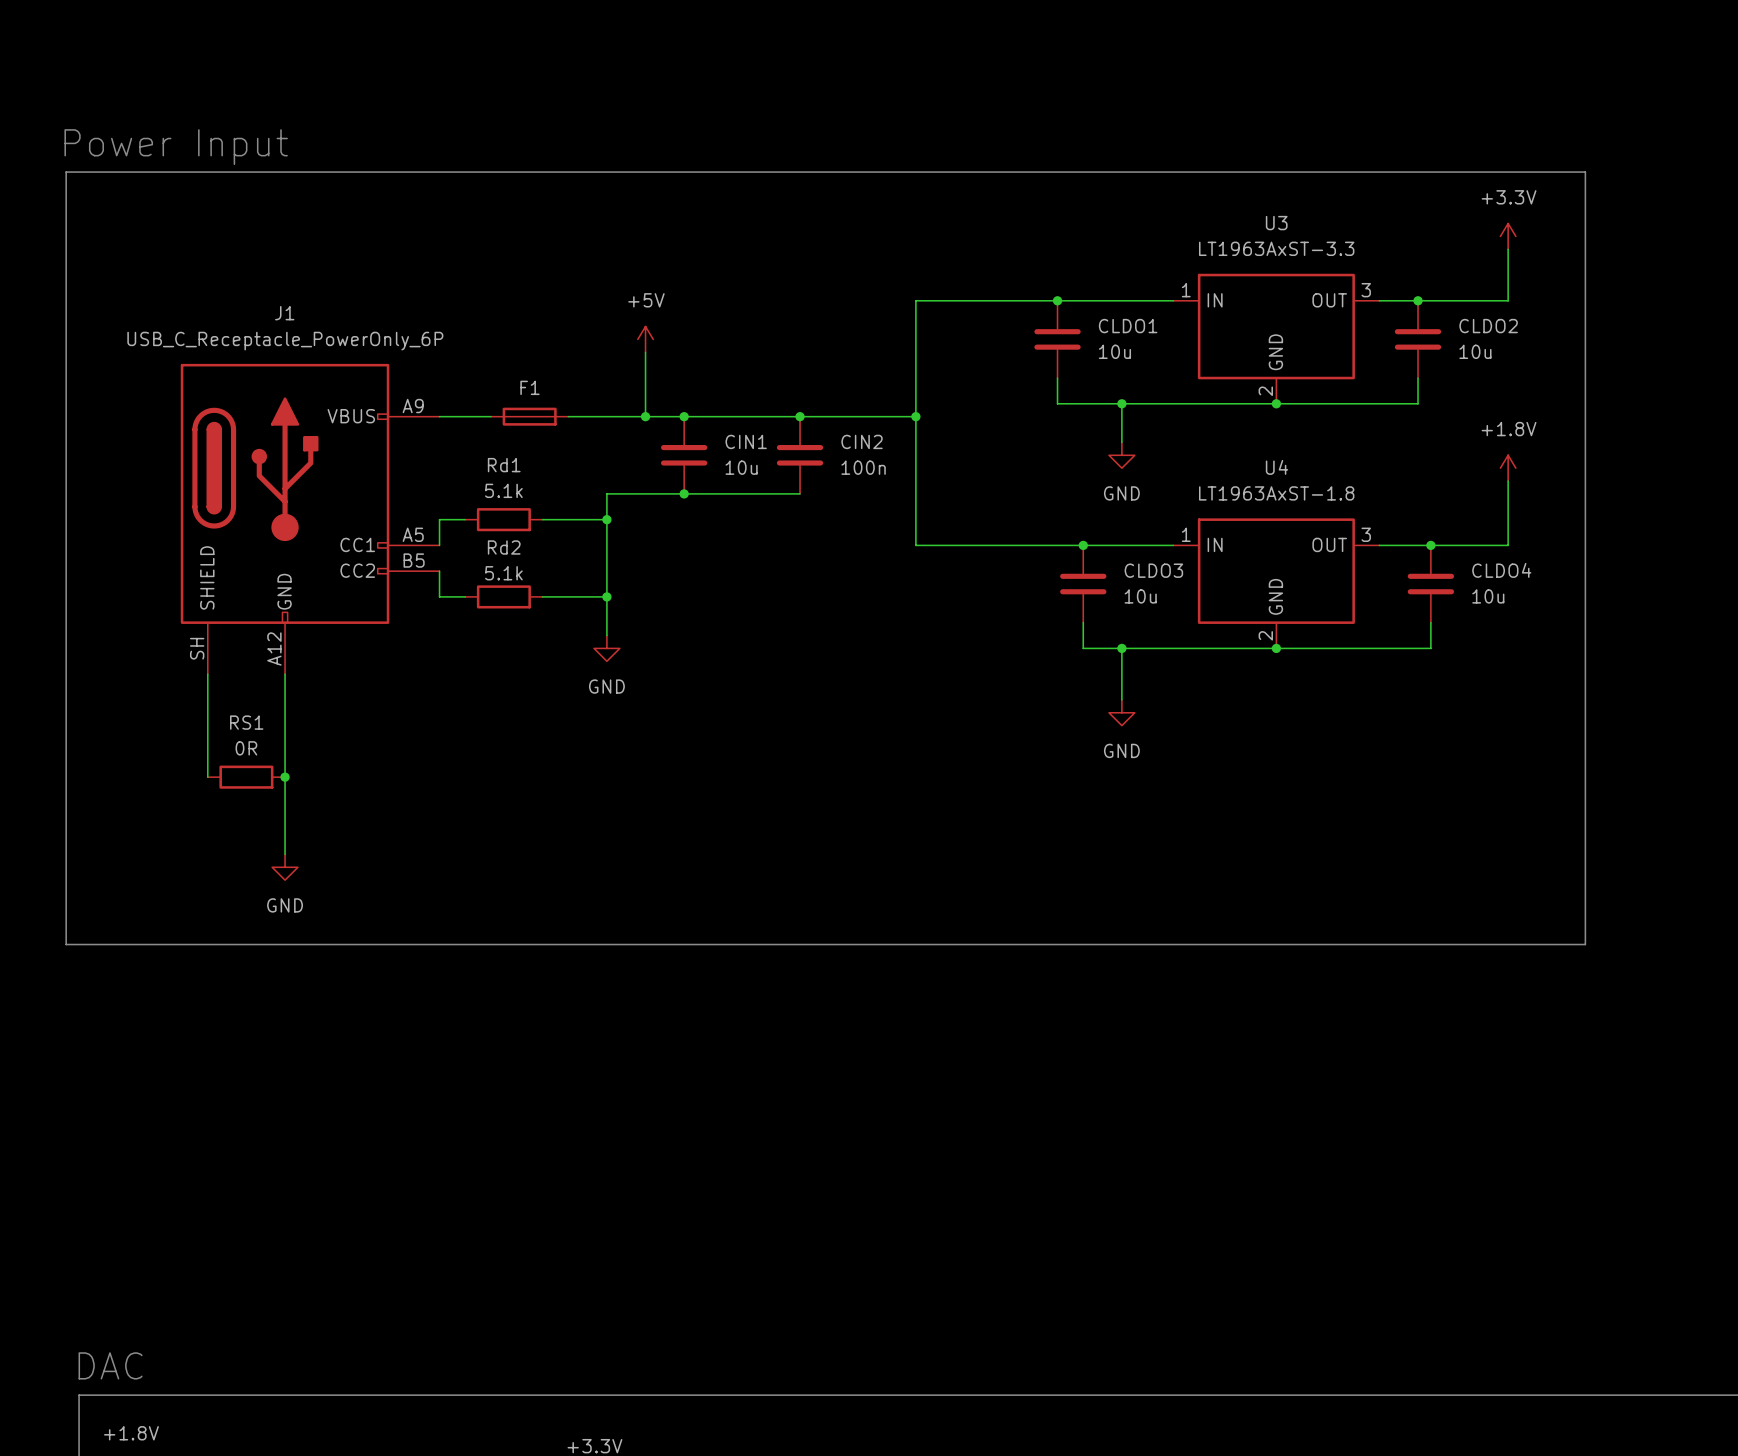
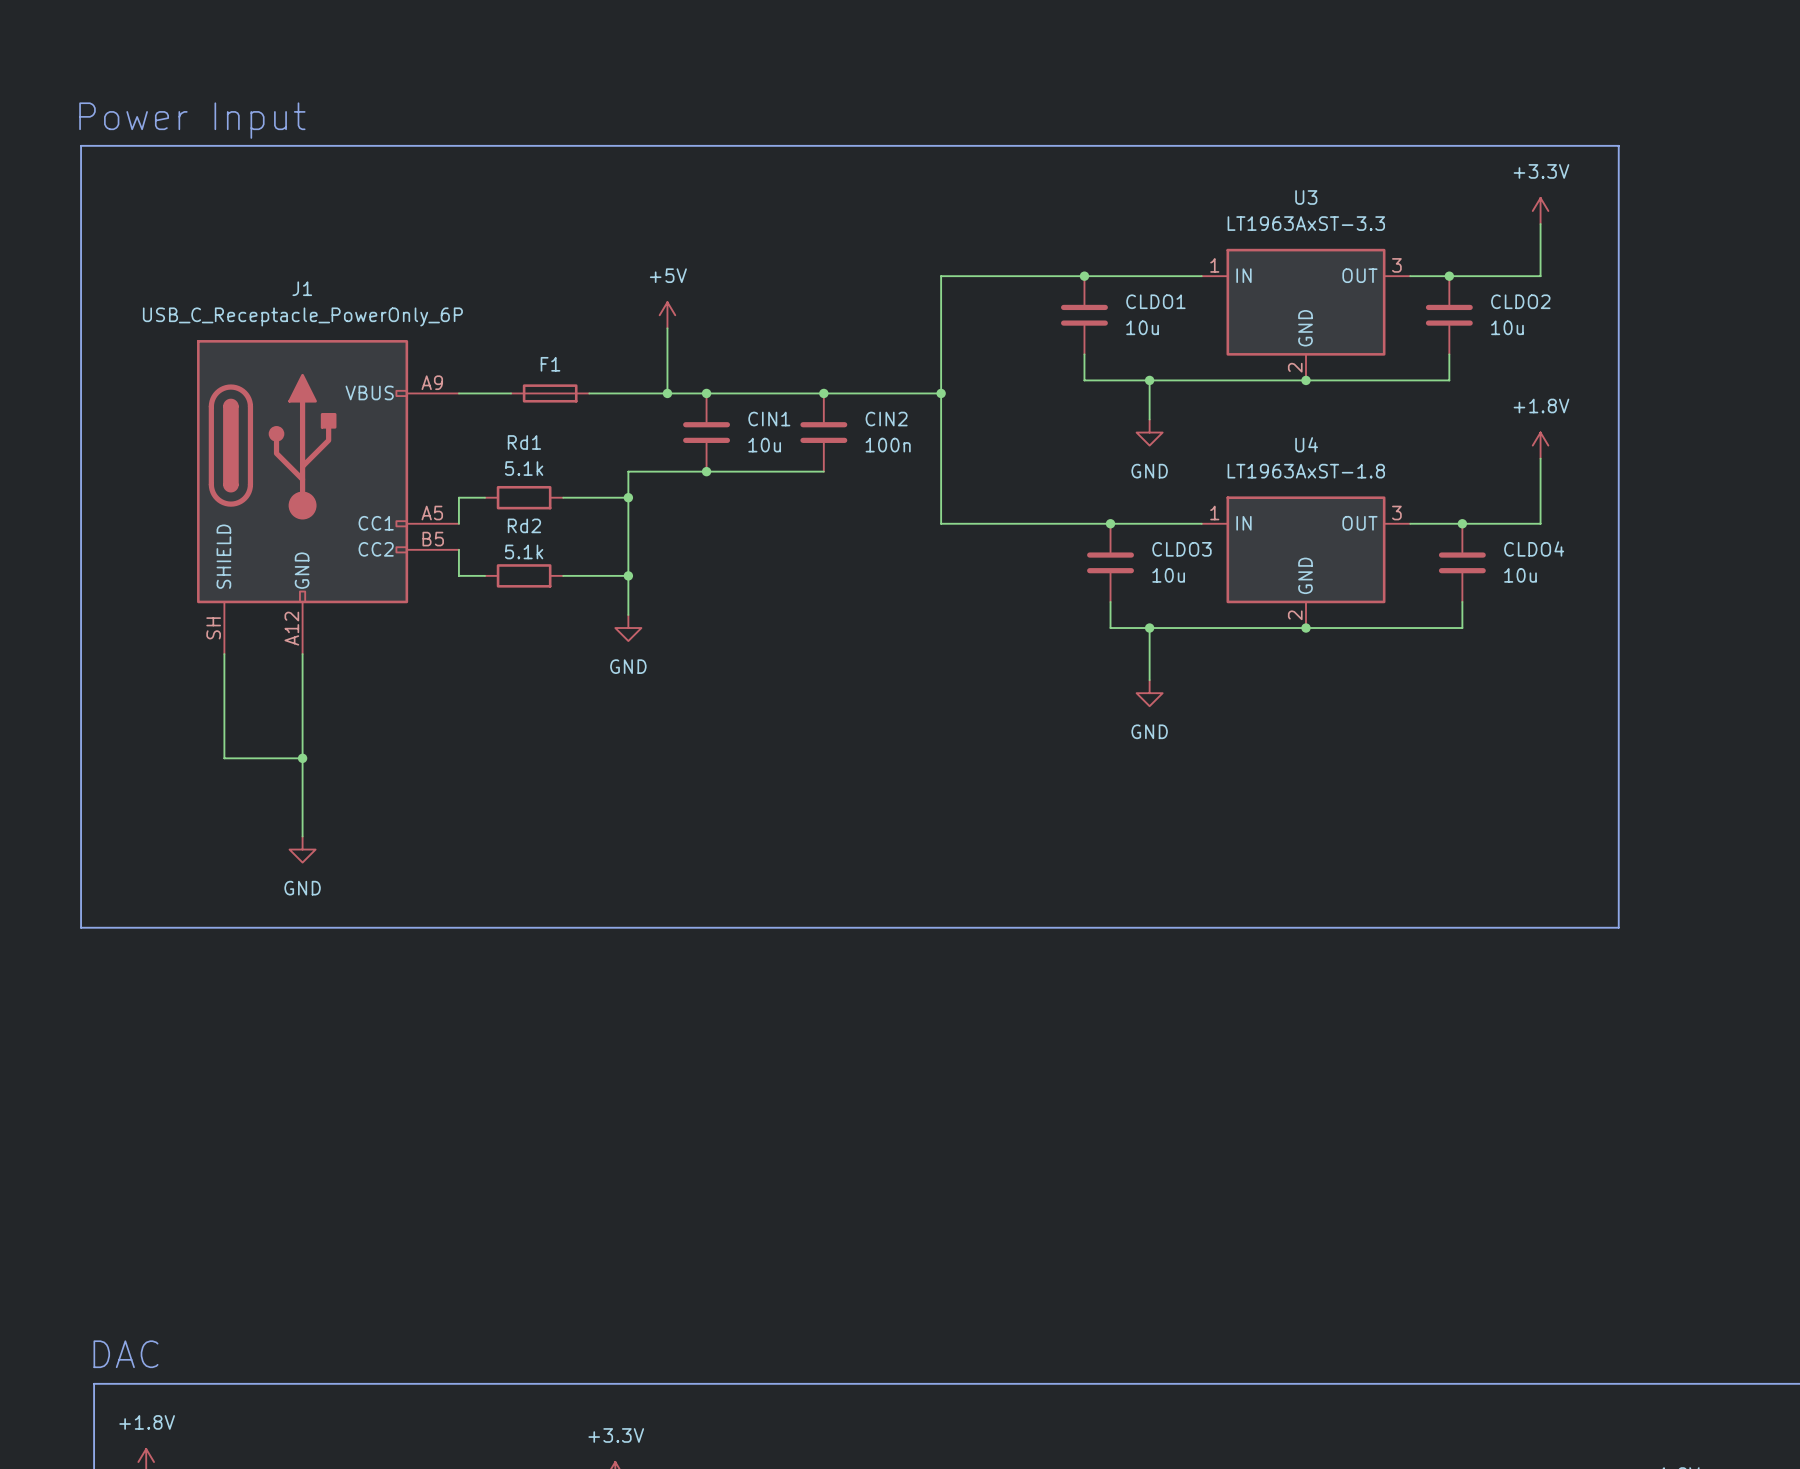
wire: none -> (224, 758) (302, 758)
RS1: 0R (246, 777) -> none

